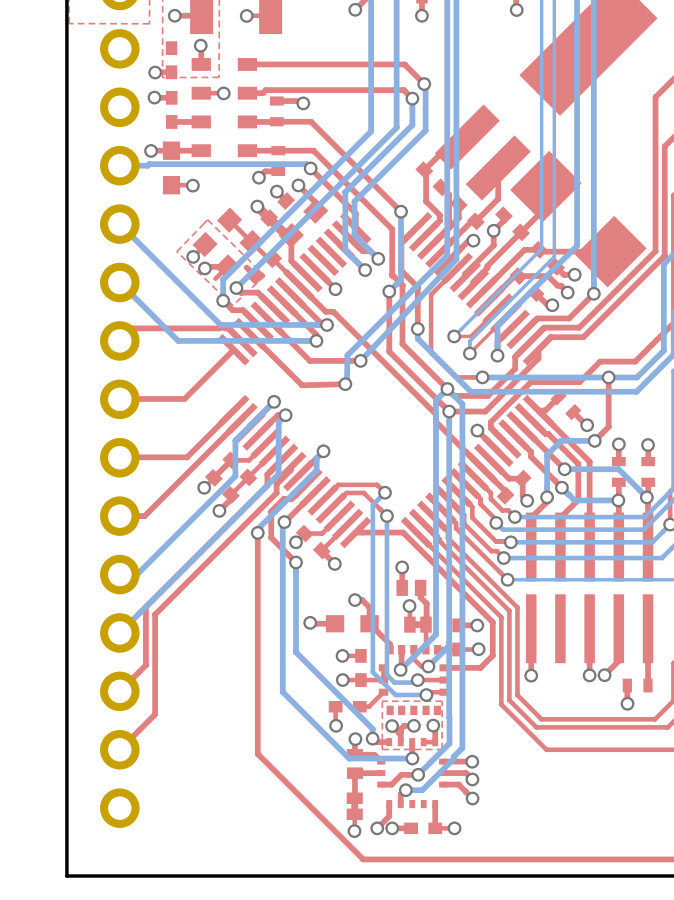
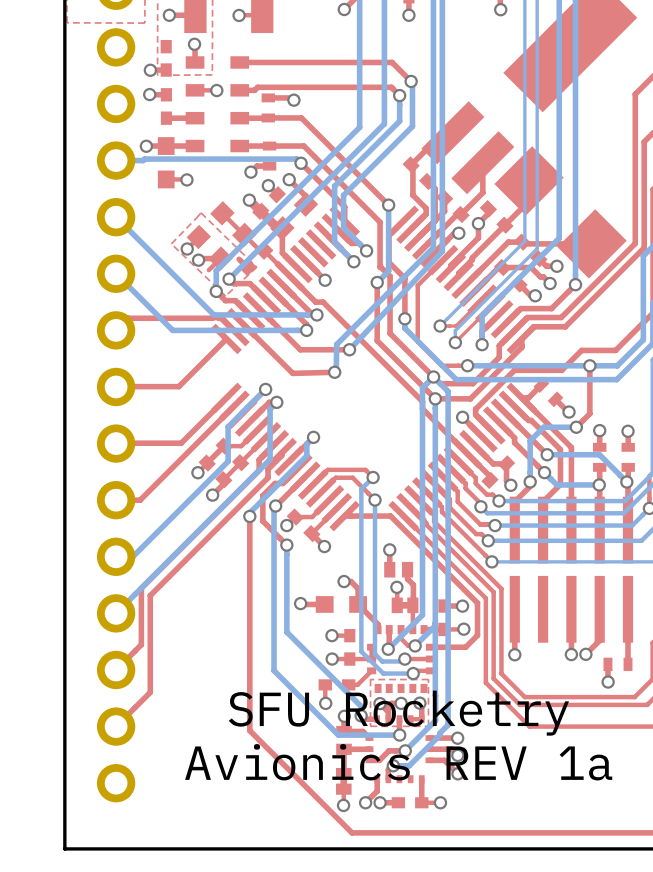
text: none -> SFU Rocketry (398, 713)
text: none -> Avionics REV 1a (398, 762)

